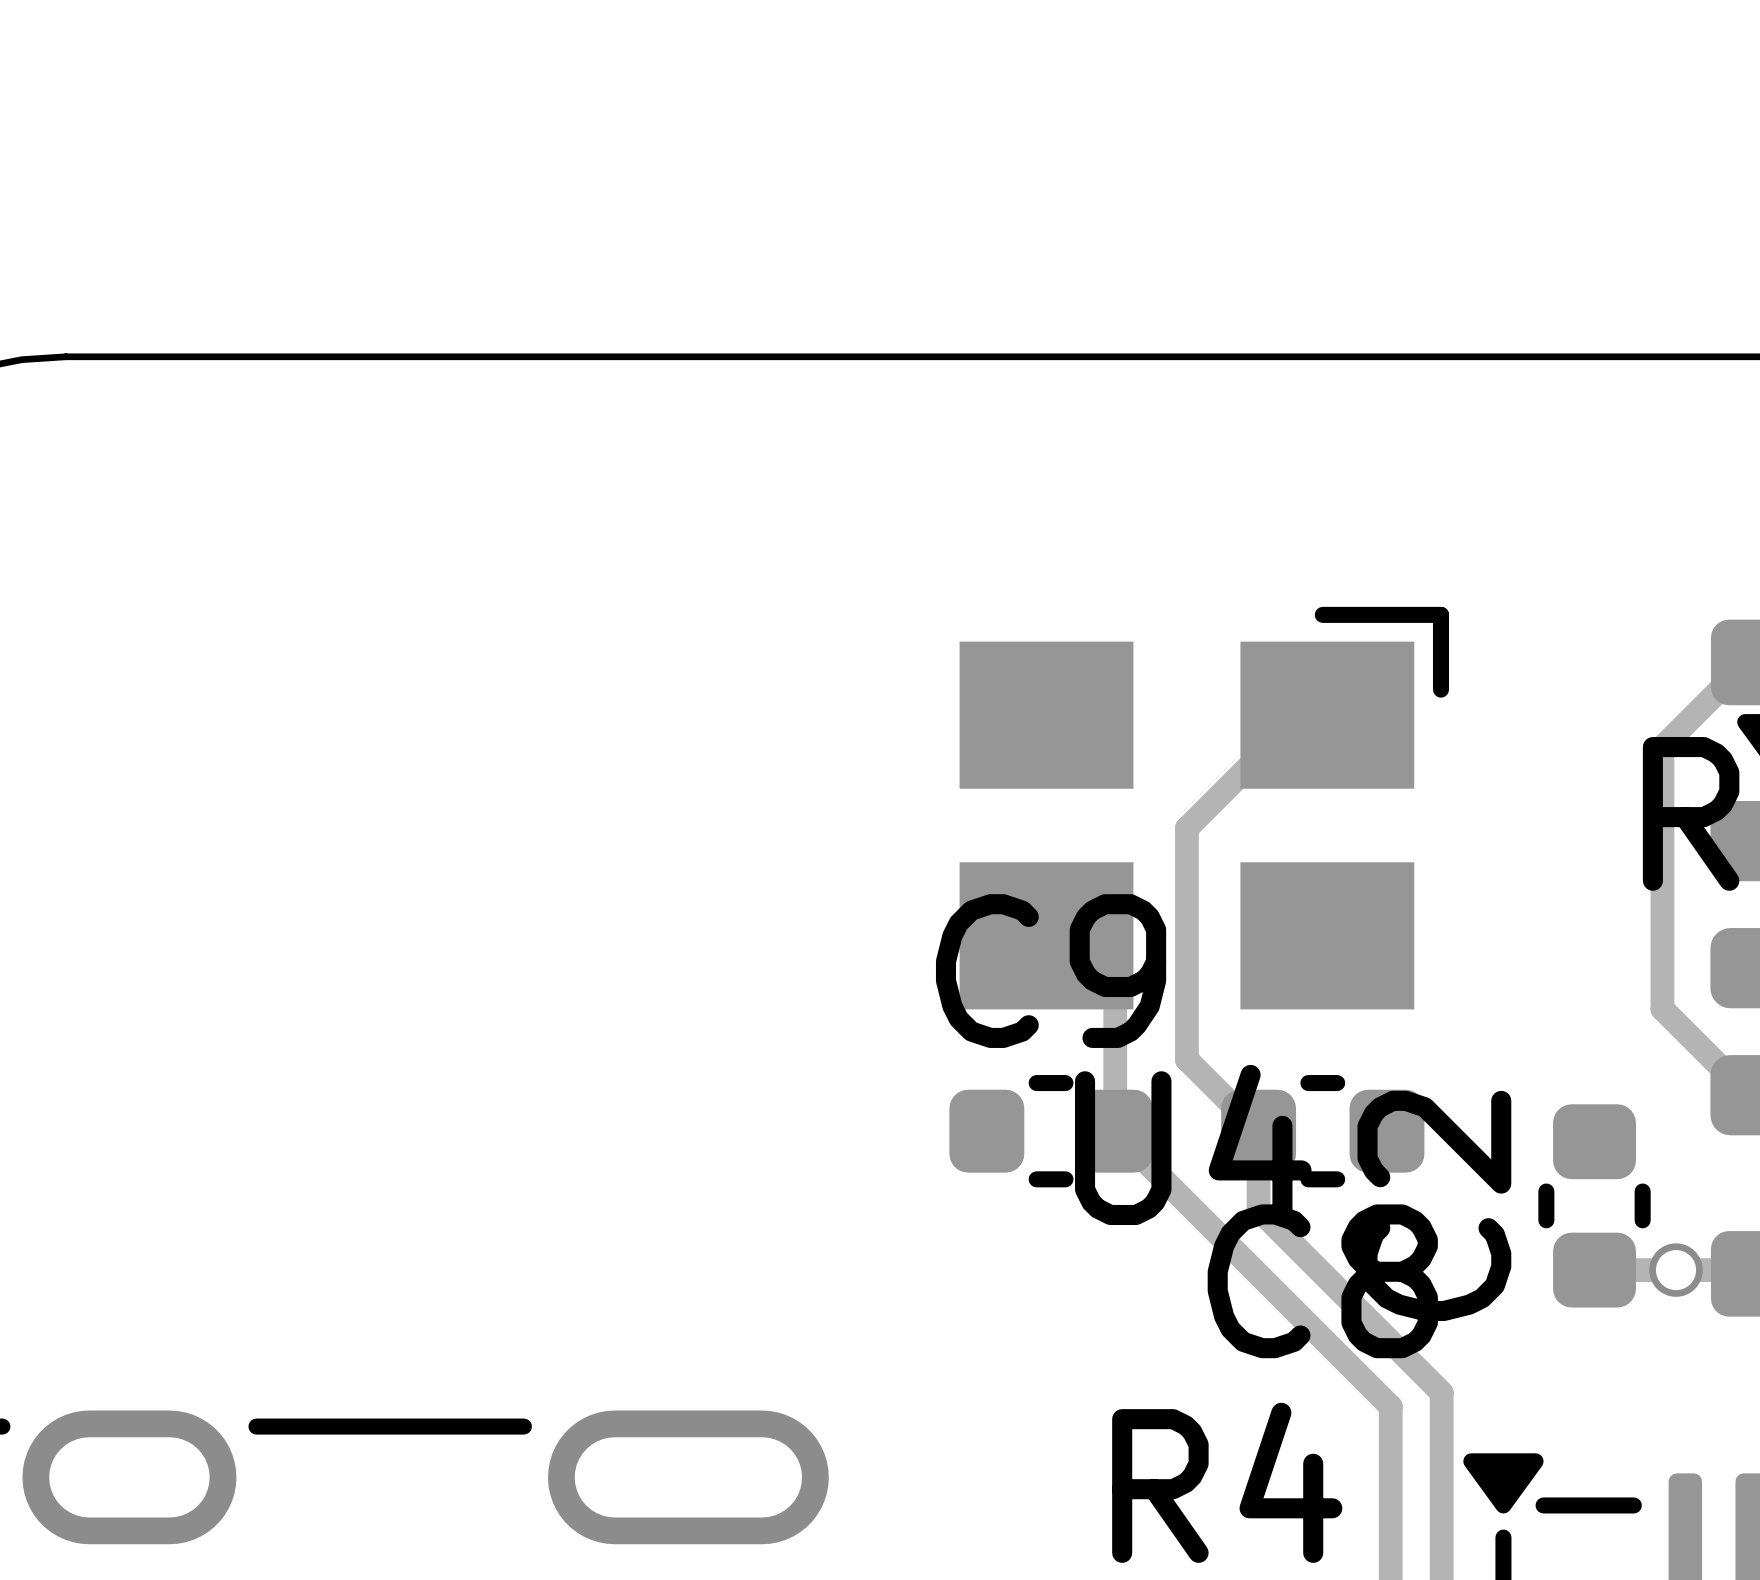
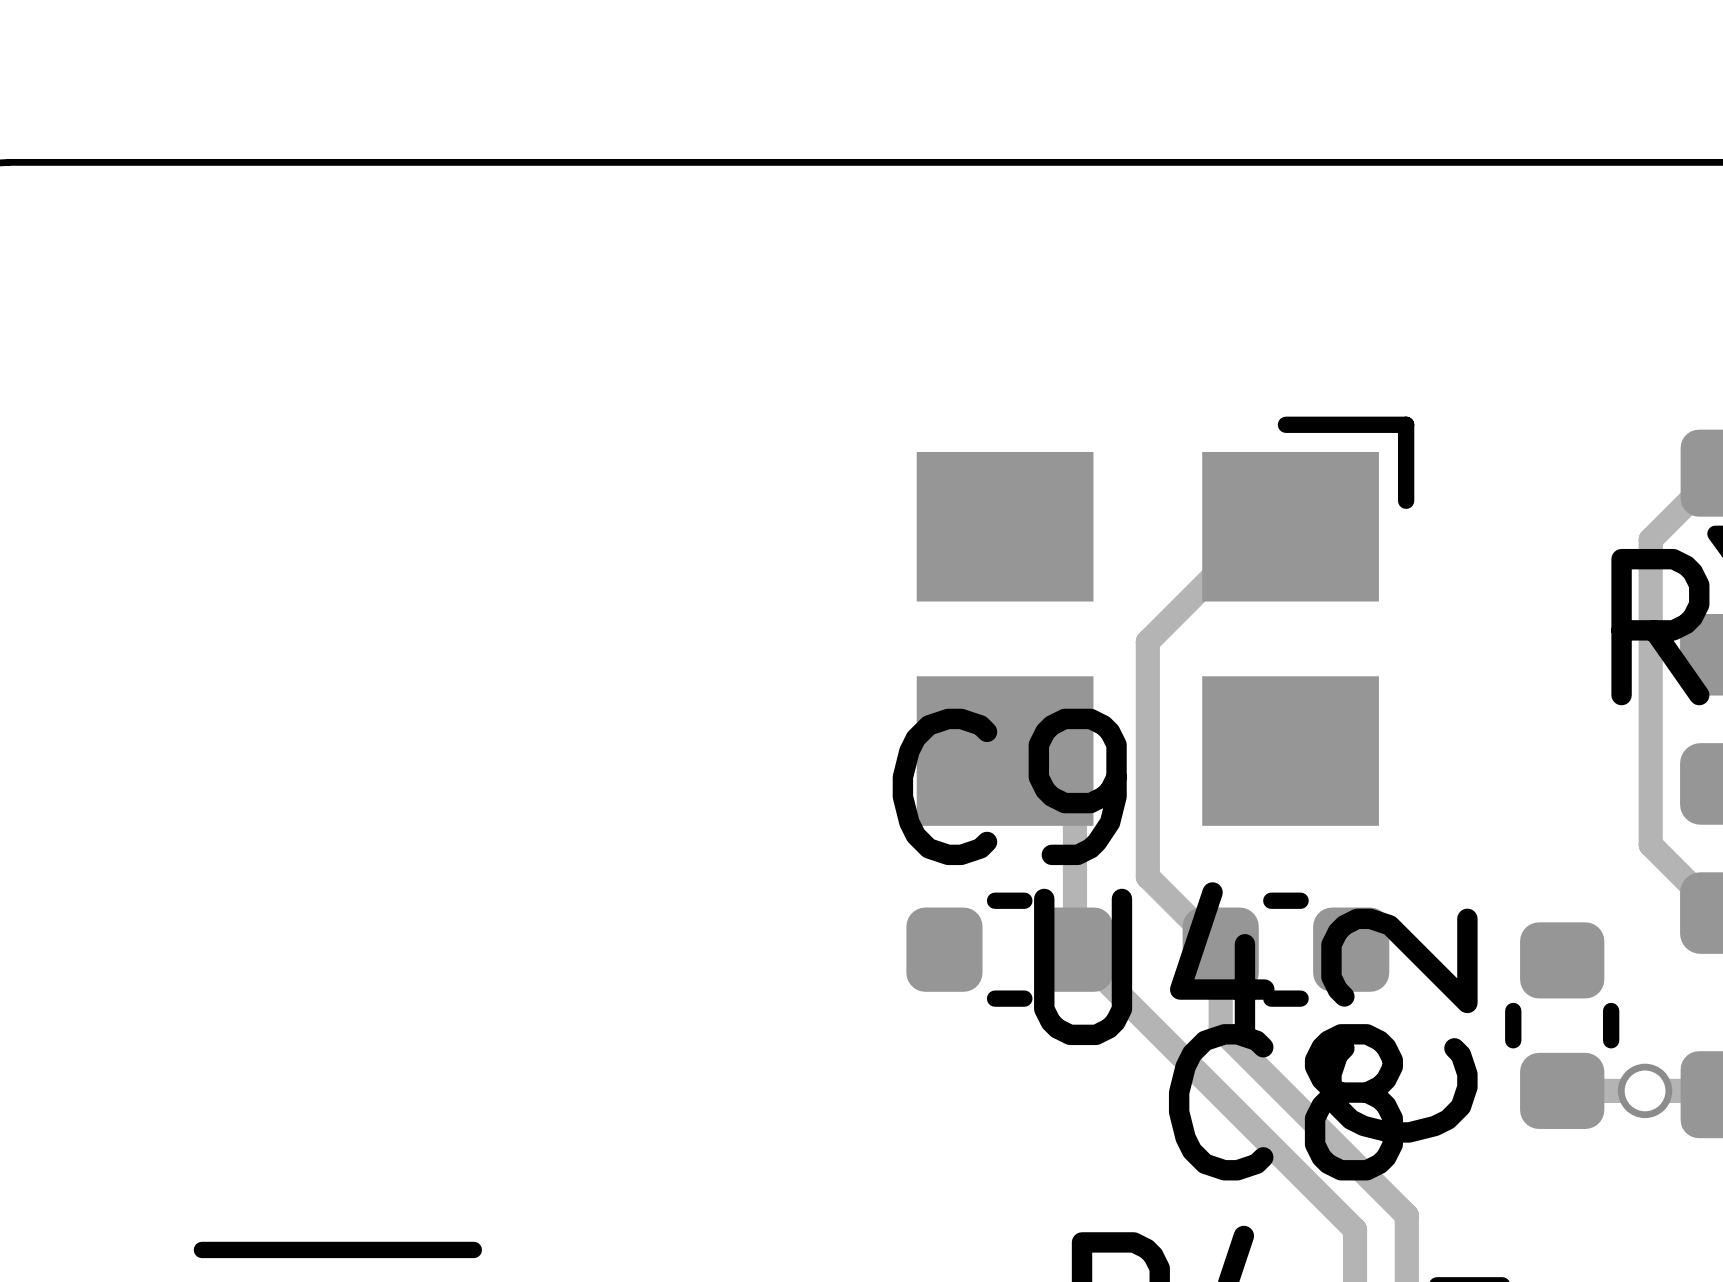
track: (1681, 727) (1662, 747) (1662, 1008) (1681, 1028) -> (1650, 539) (1650, 844)

